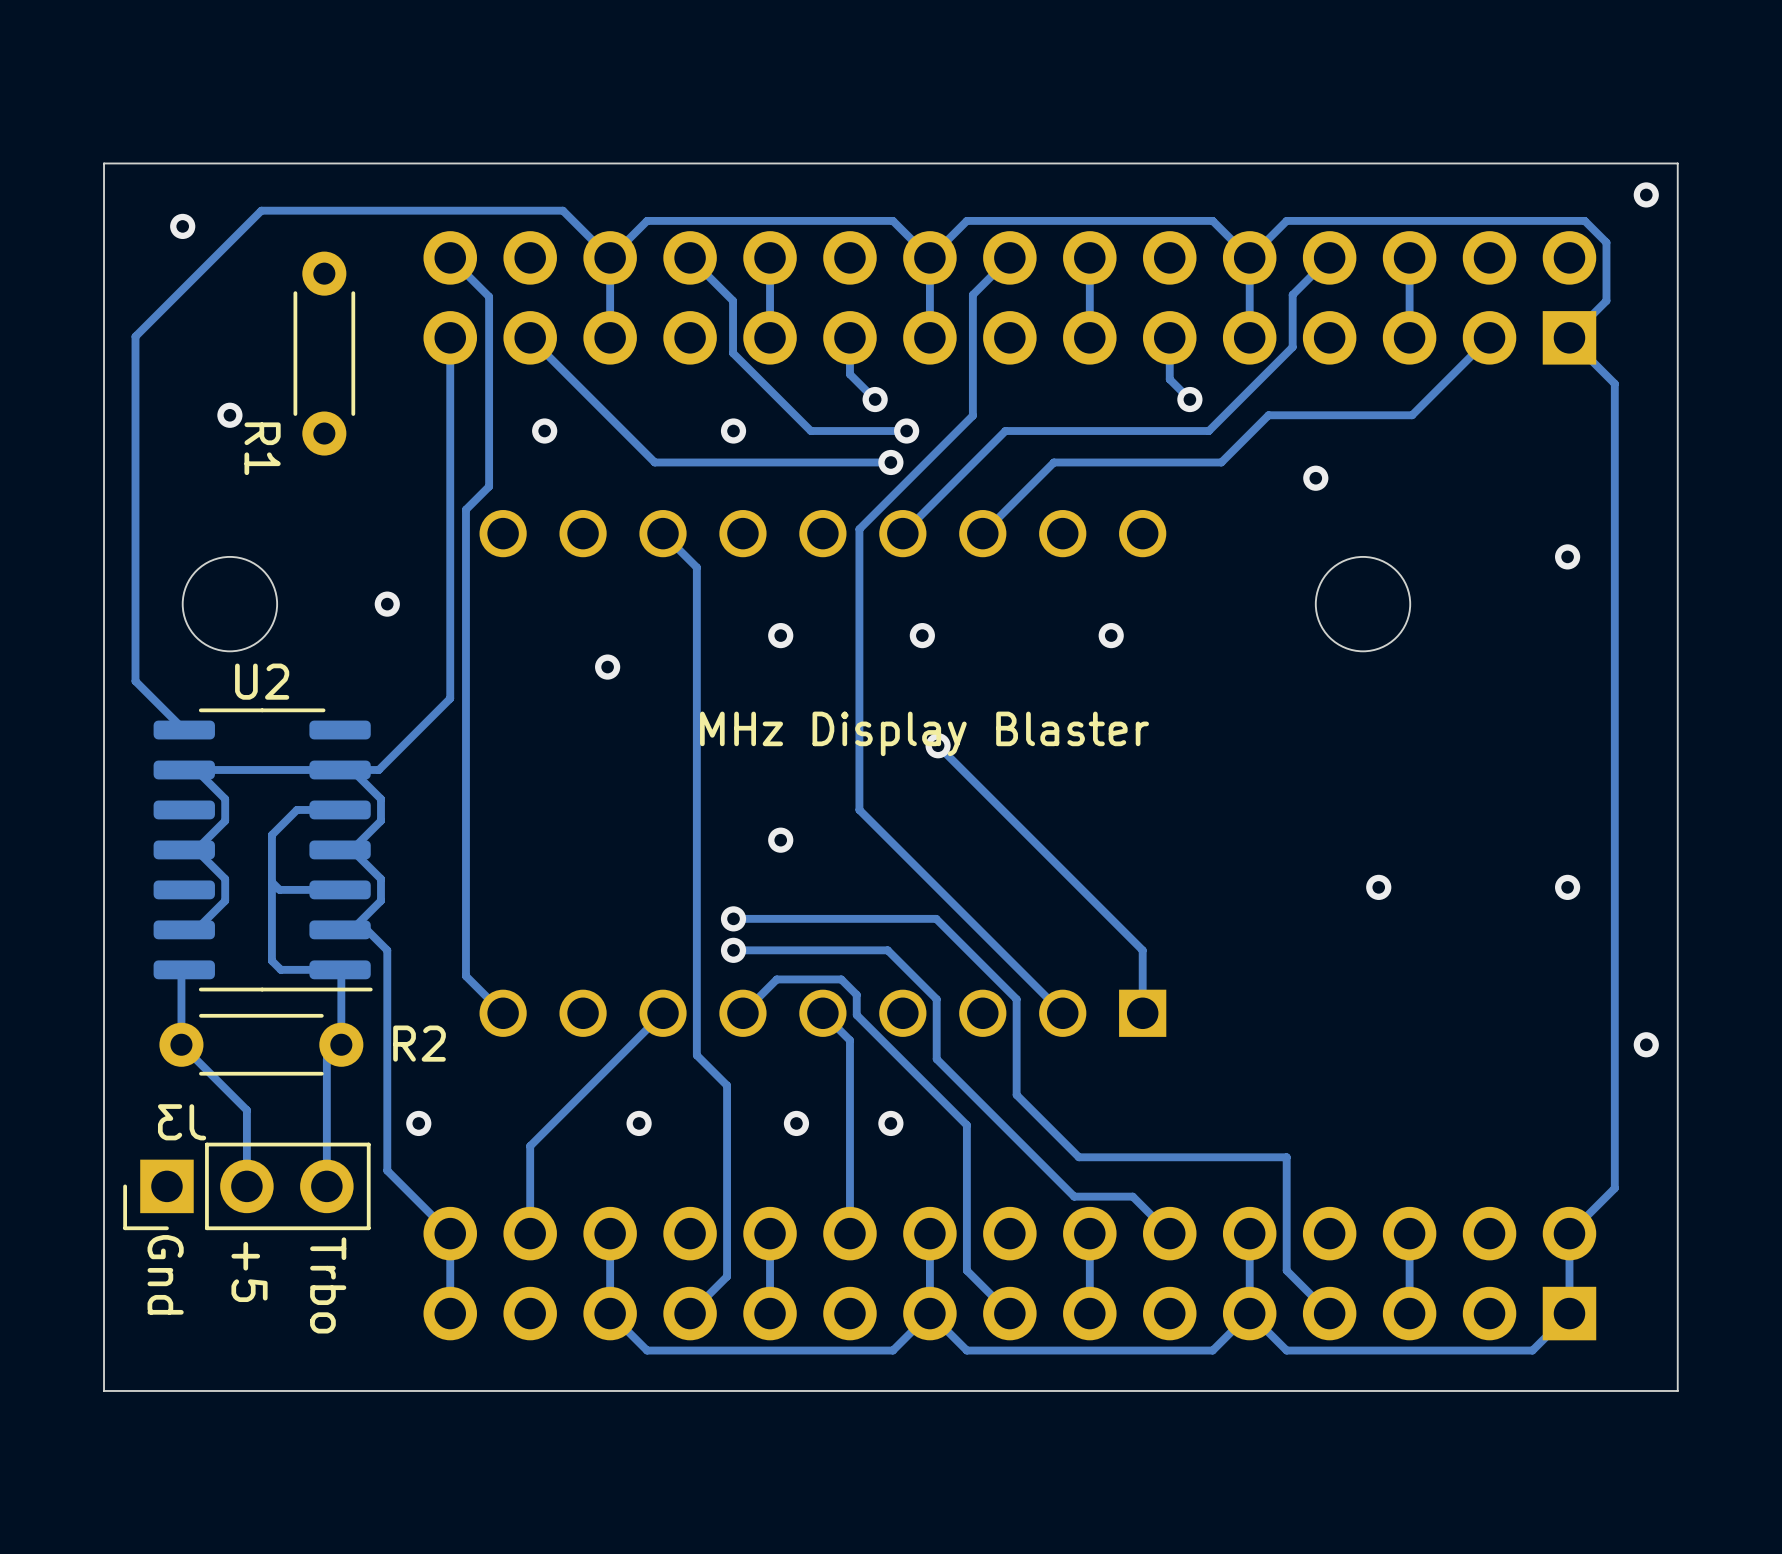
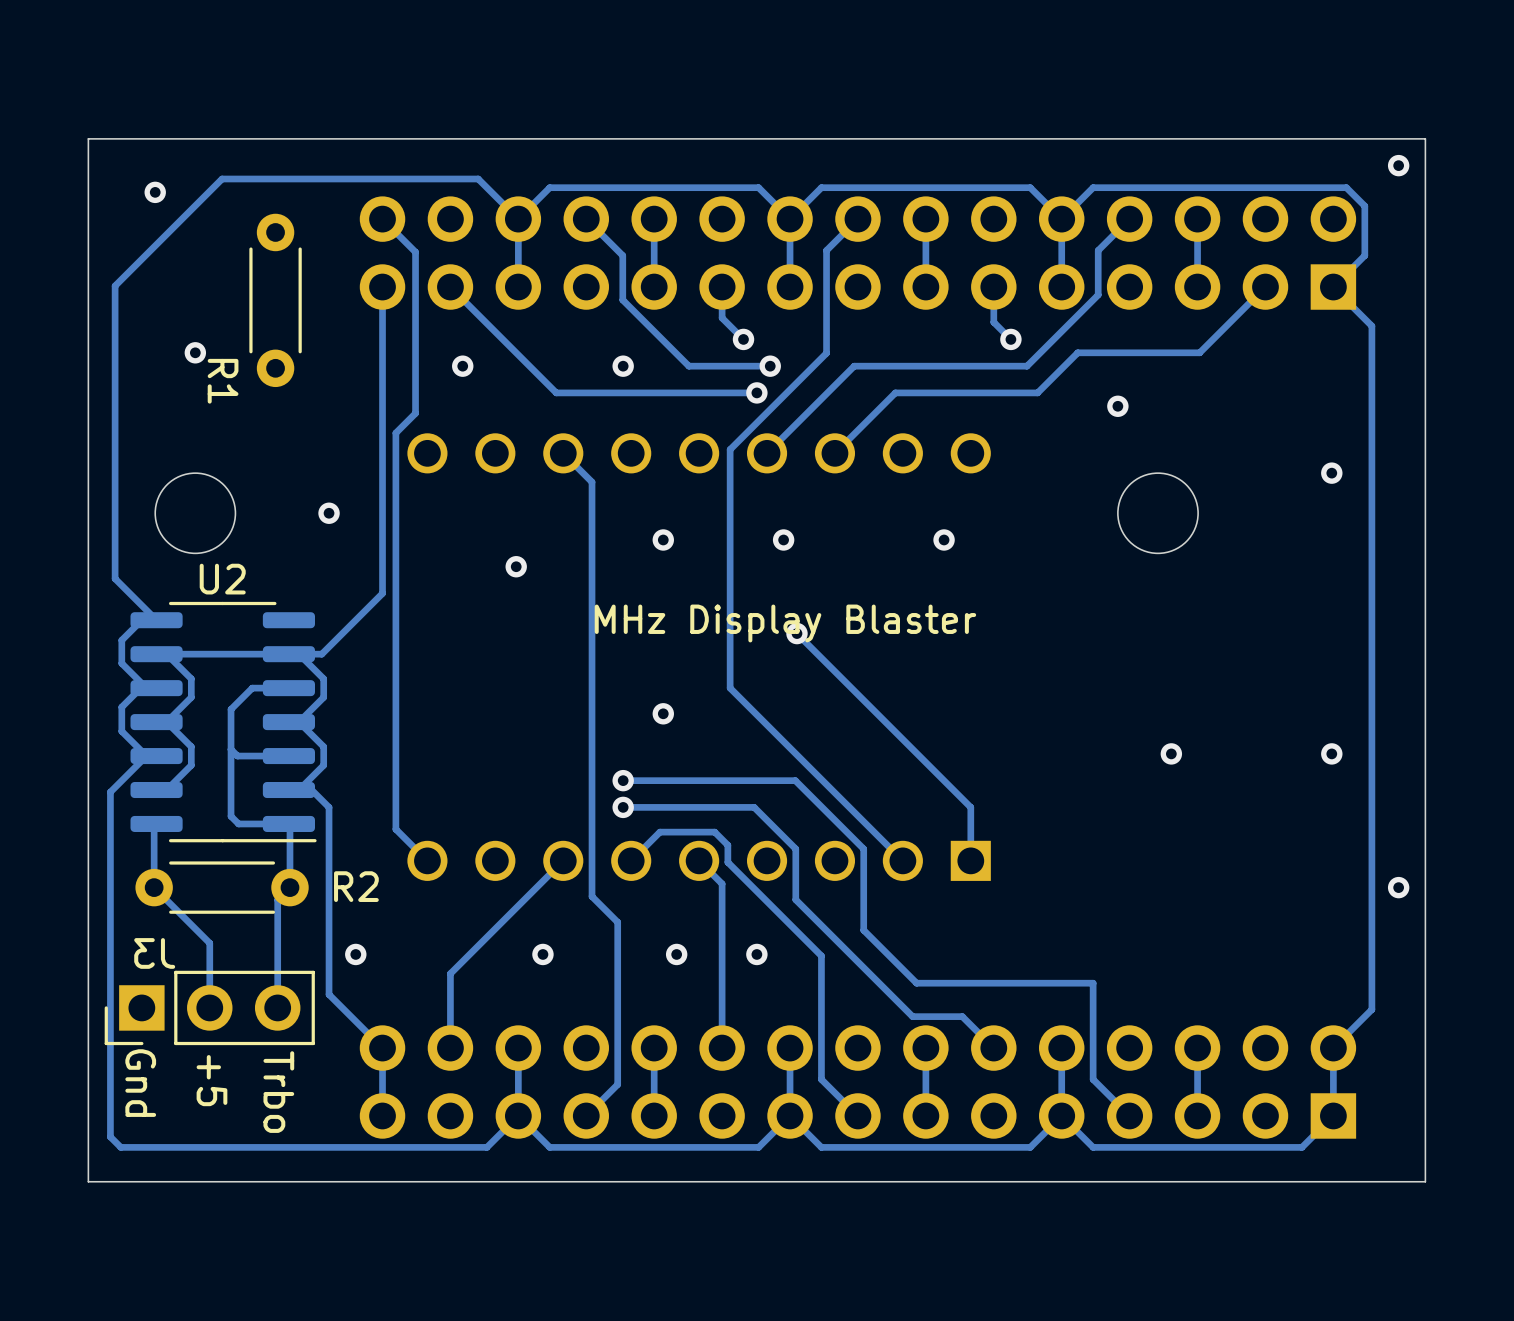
track: none -> (156, 620) (141, 620) (121, 640) (121, 663) (146, 688)
track: none -> (156, 688) (140, 688) (121, 707) (121, 731) (146, 756)
track: none -> (146, 756) (110, 792) (110, 1136) (120, 1147) (486, 1147) (518, 1115)

